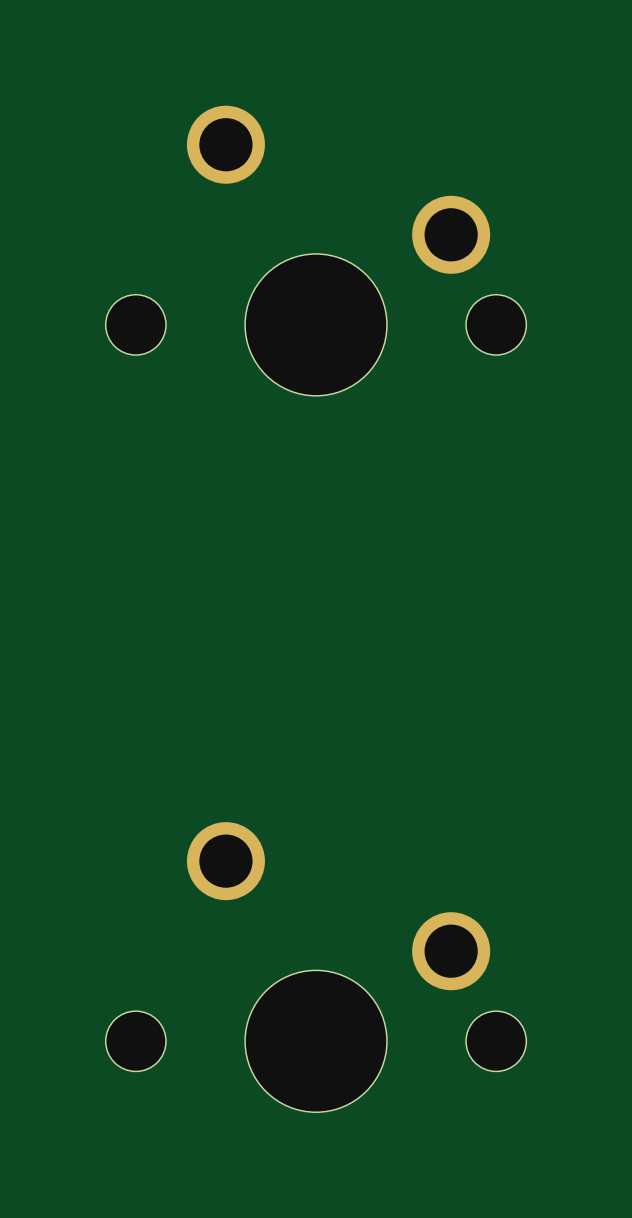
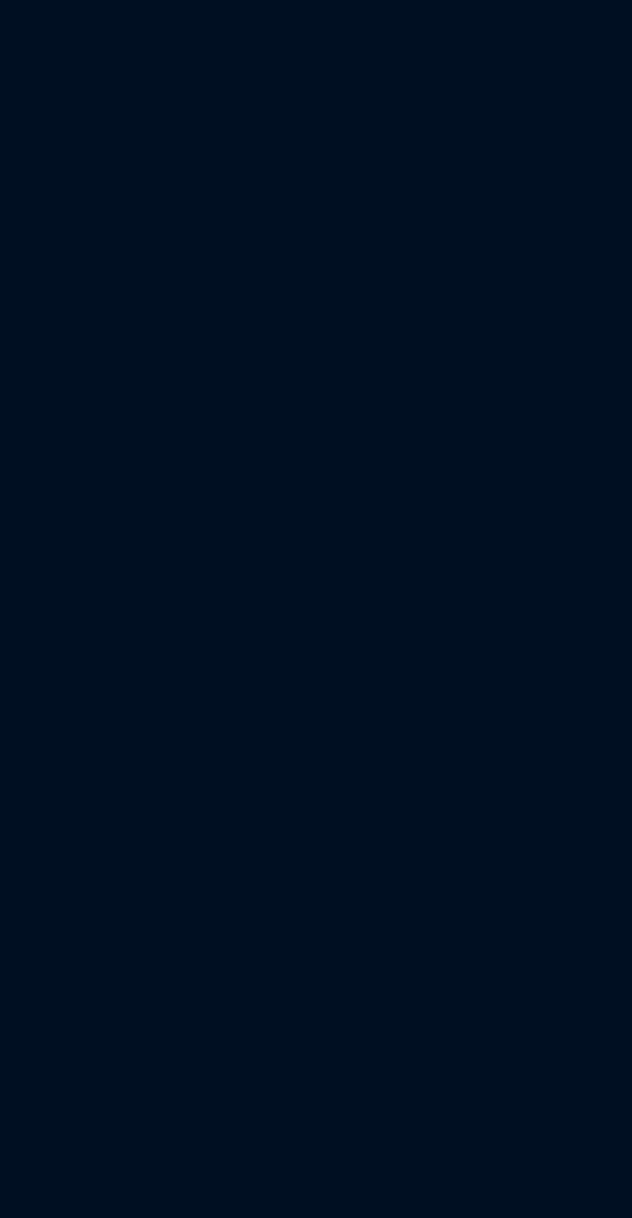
part: (316, 250) -> none
part: (316, 967) -> none

